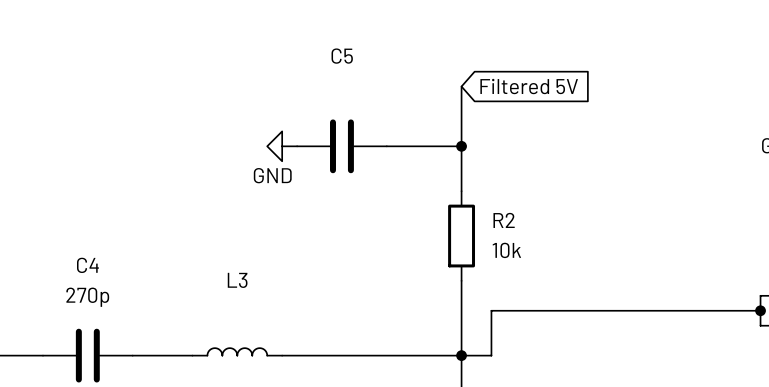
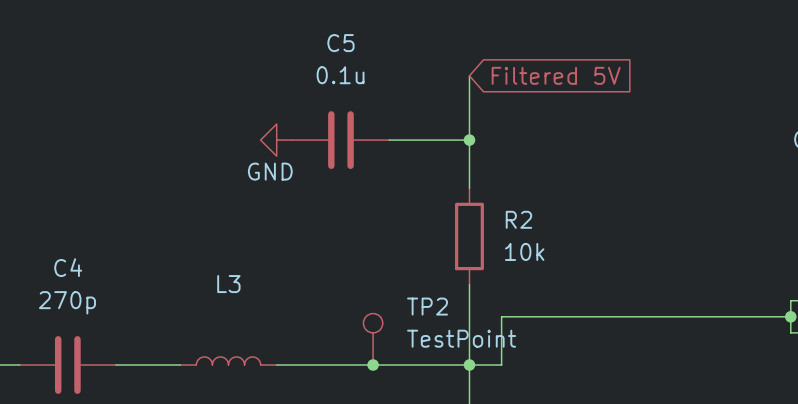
C5 value: none -> 0.1u (340, 75)
TP2: none -> TestPoint (373, 339)
junction: none -> (373, 364)

